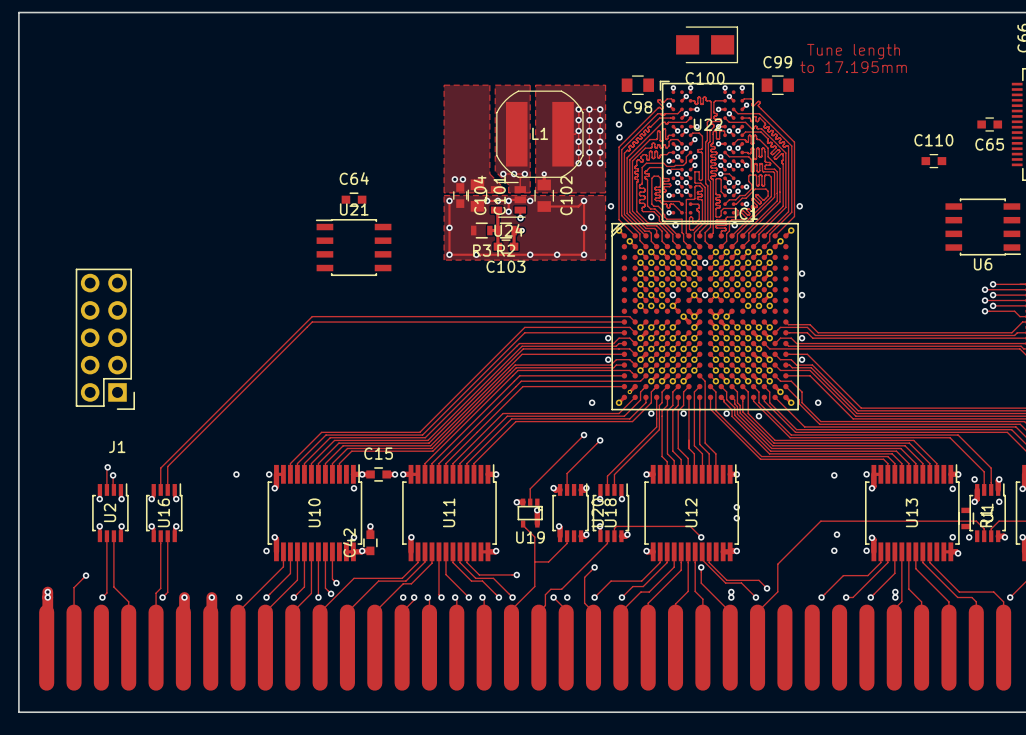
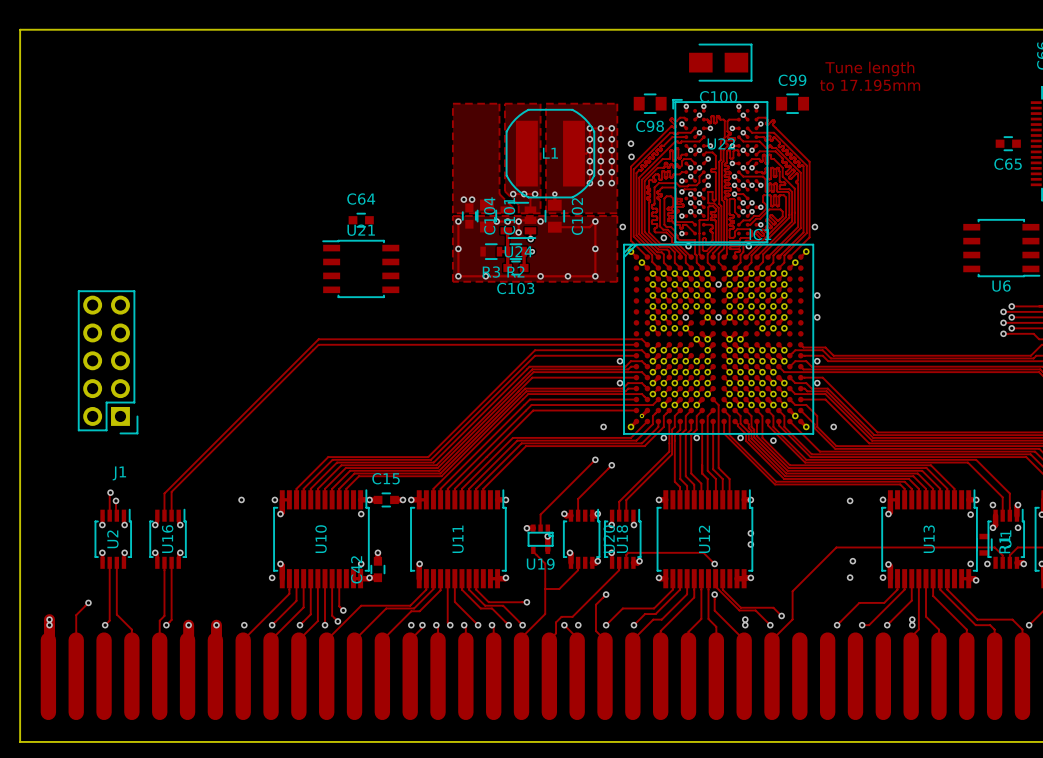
C110: (933, 161) -> none

